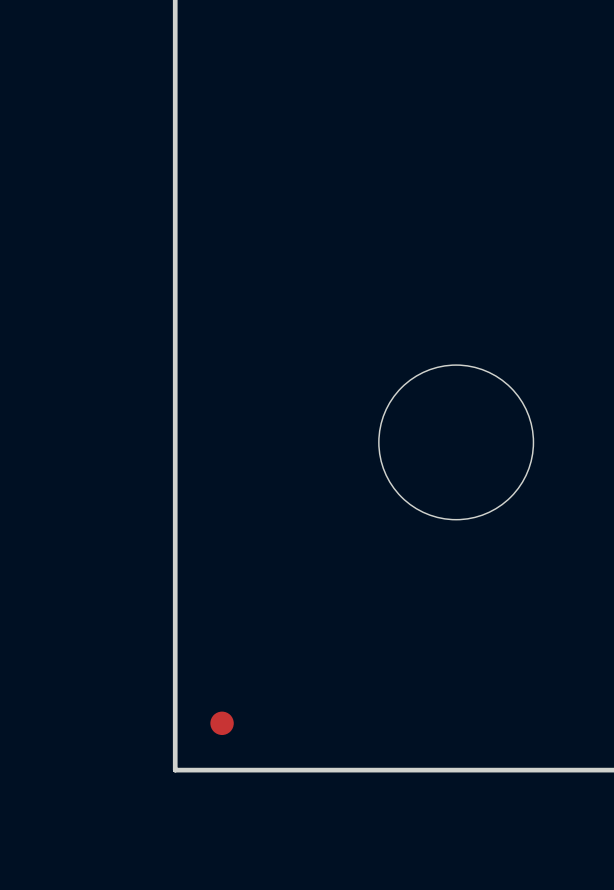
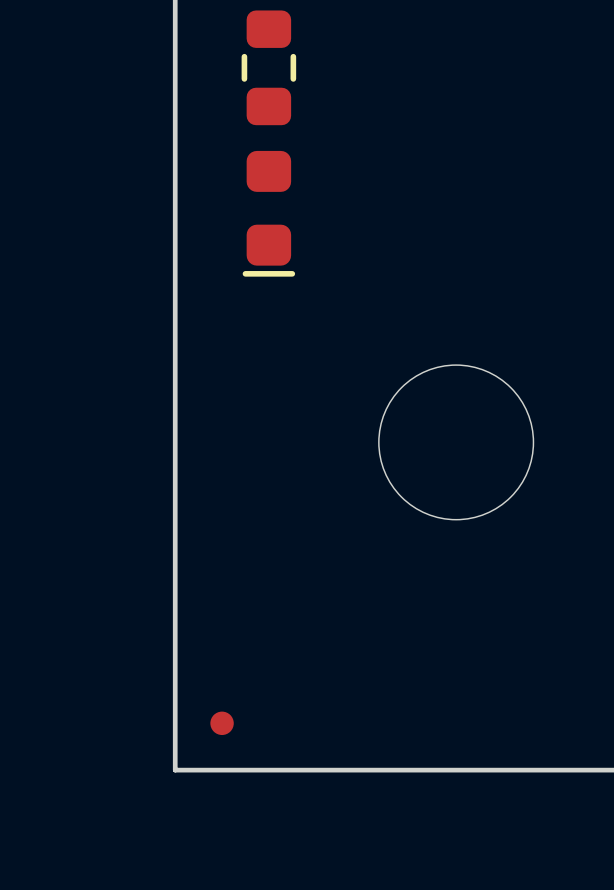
part: none -> (268, 67)
part: none -> (268, 213)

